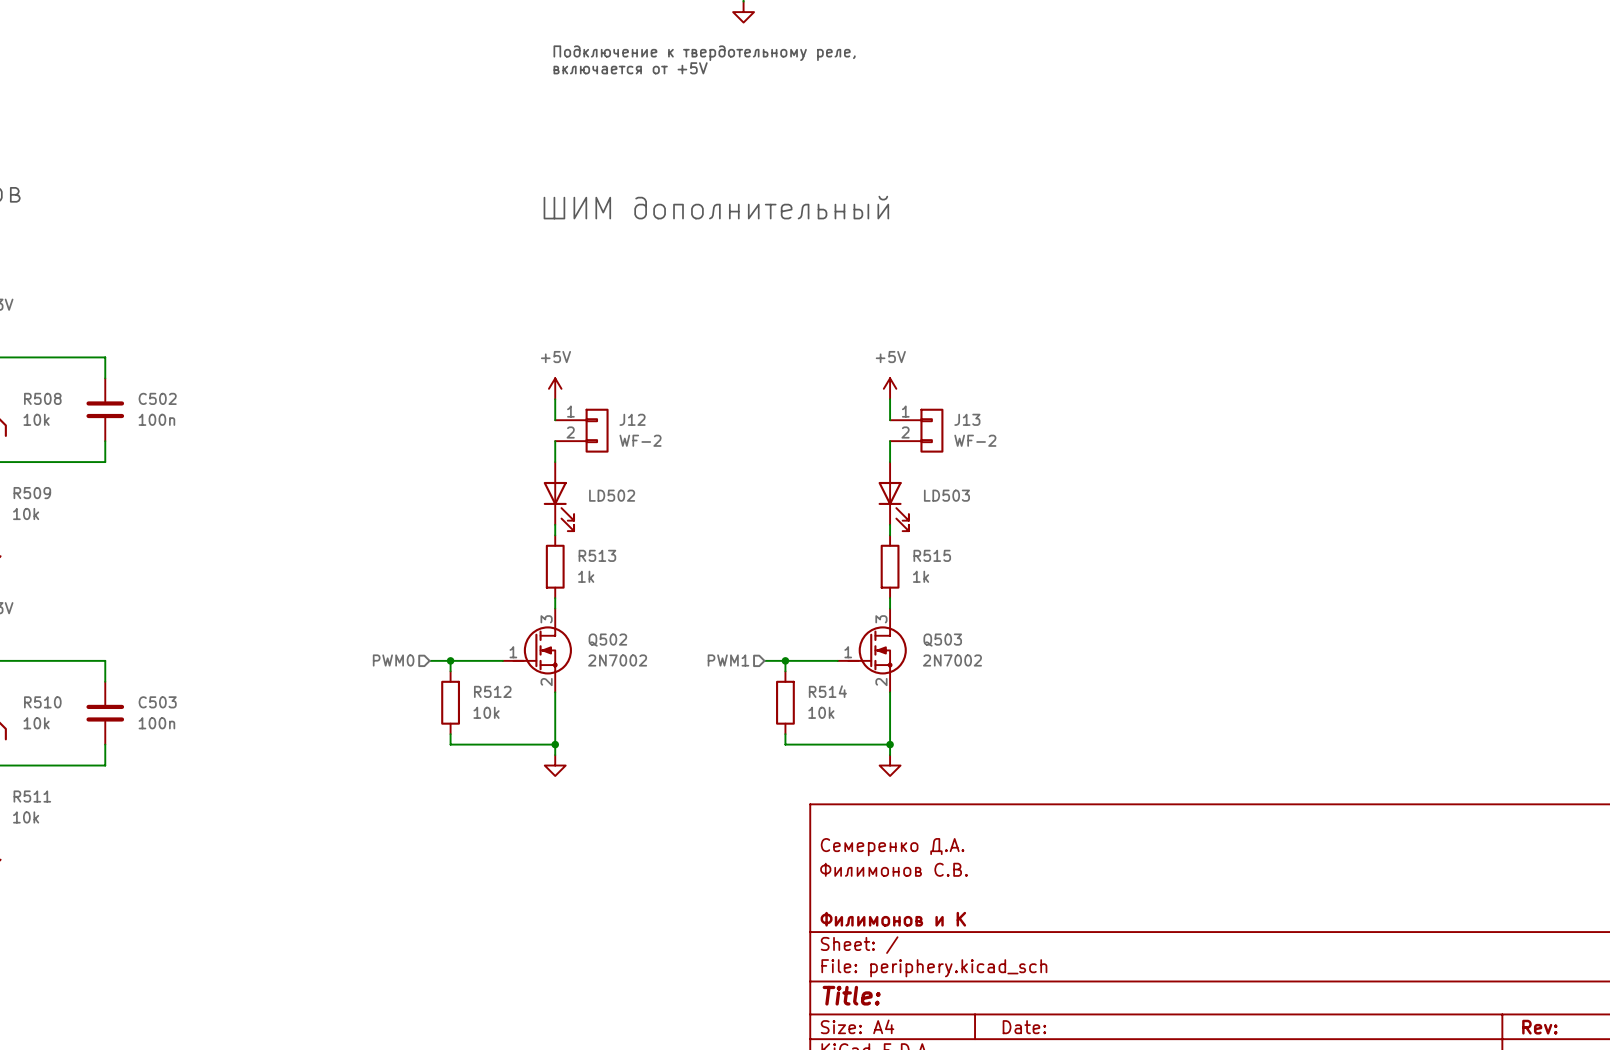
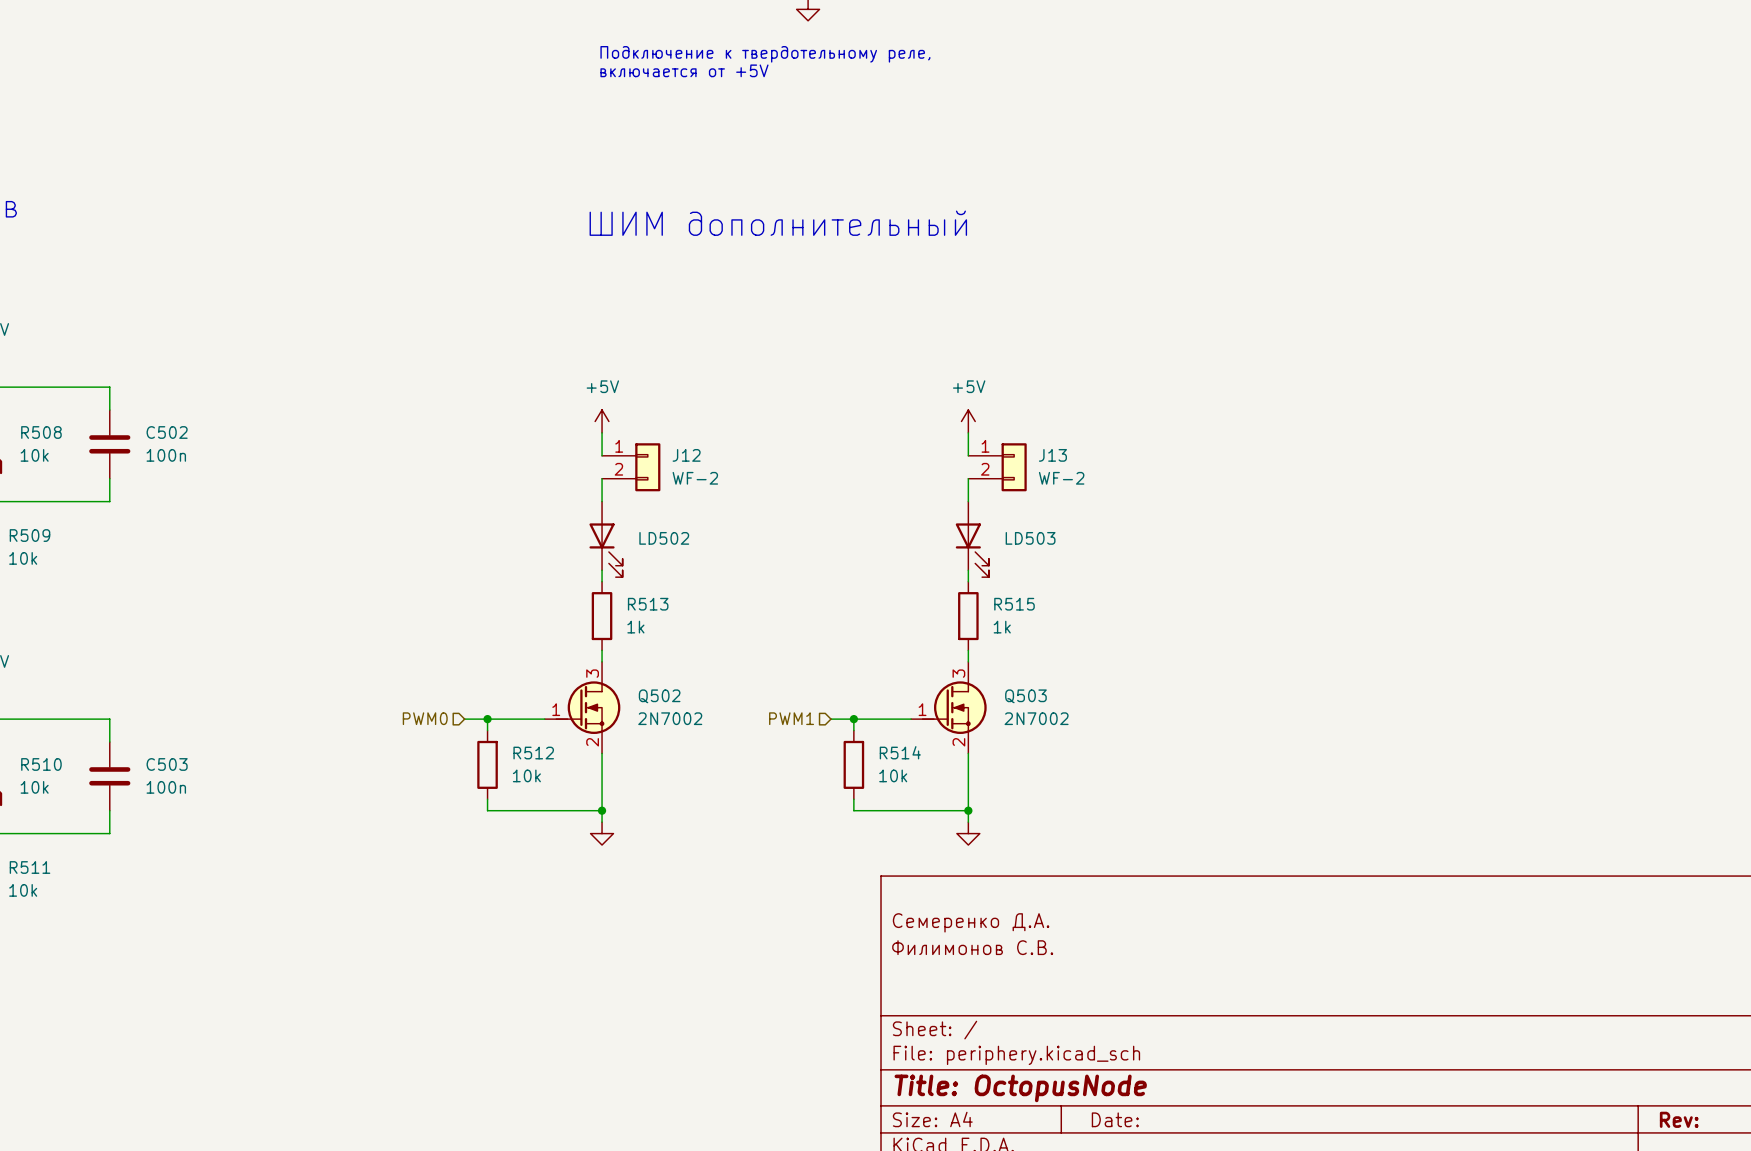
title block: Филимонов и К (893, 919) -> none
title block: Title: (851, 995) -> Title: OctopusNode (1020, 1088)

